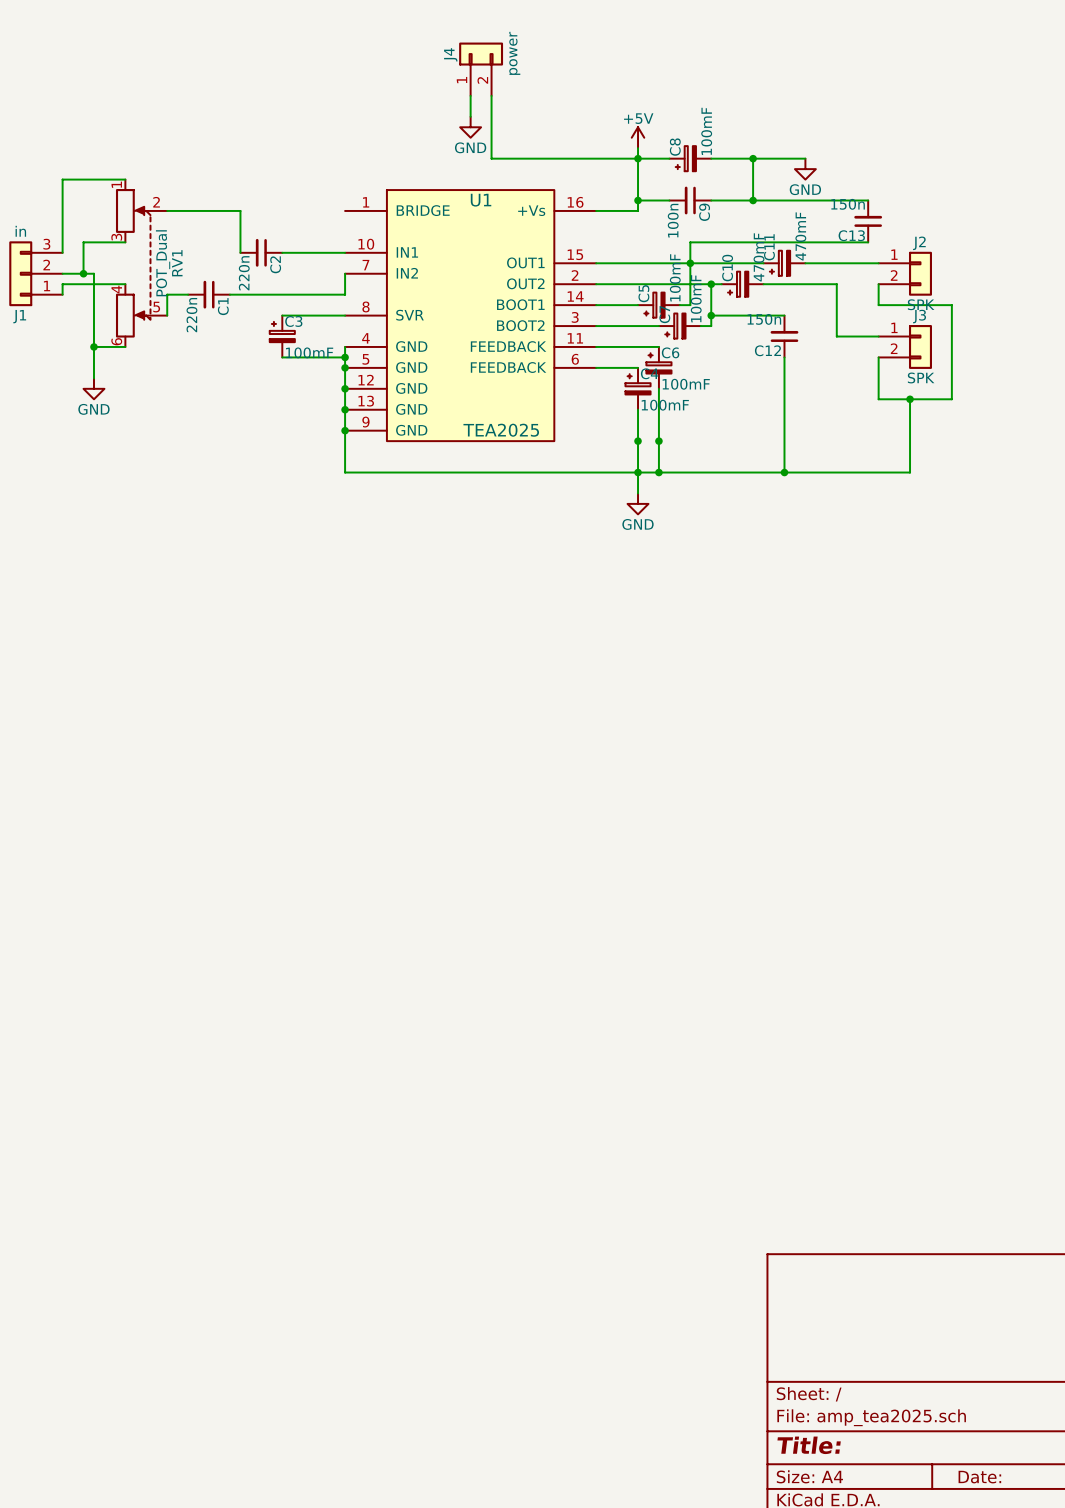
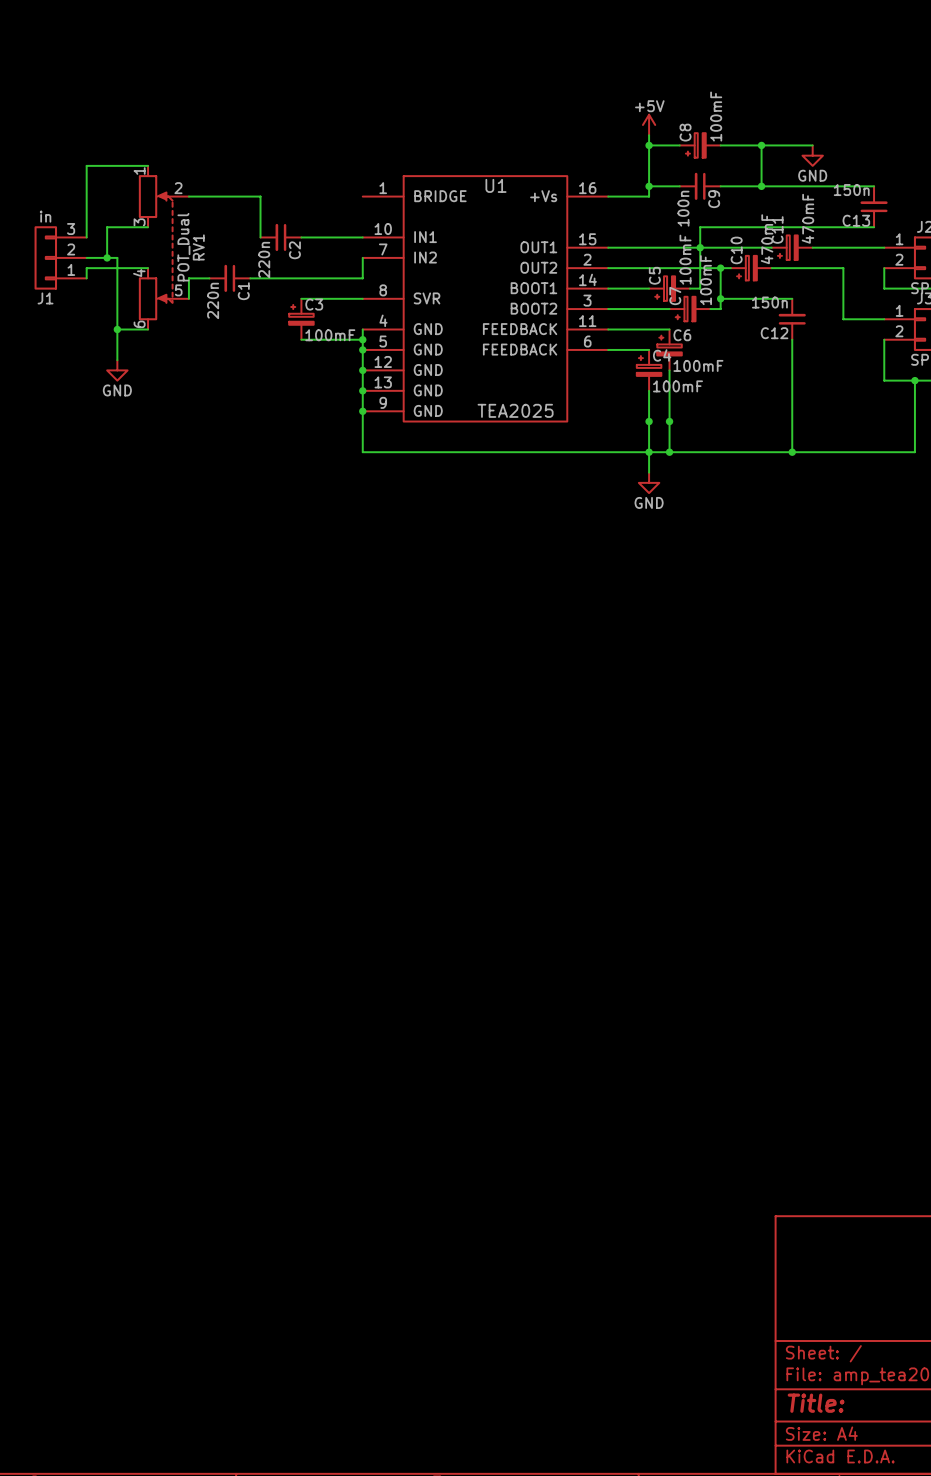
J4: power (481, 69) -> none
wire: (470, 95) (470, 116) -> none
wire: (491, 95) (491, 158) (638, 158) -> none
power symbol: GND (470, 127) -> none

